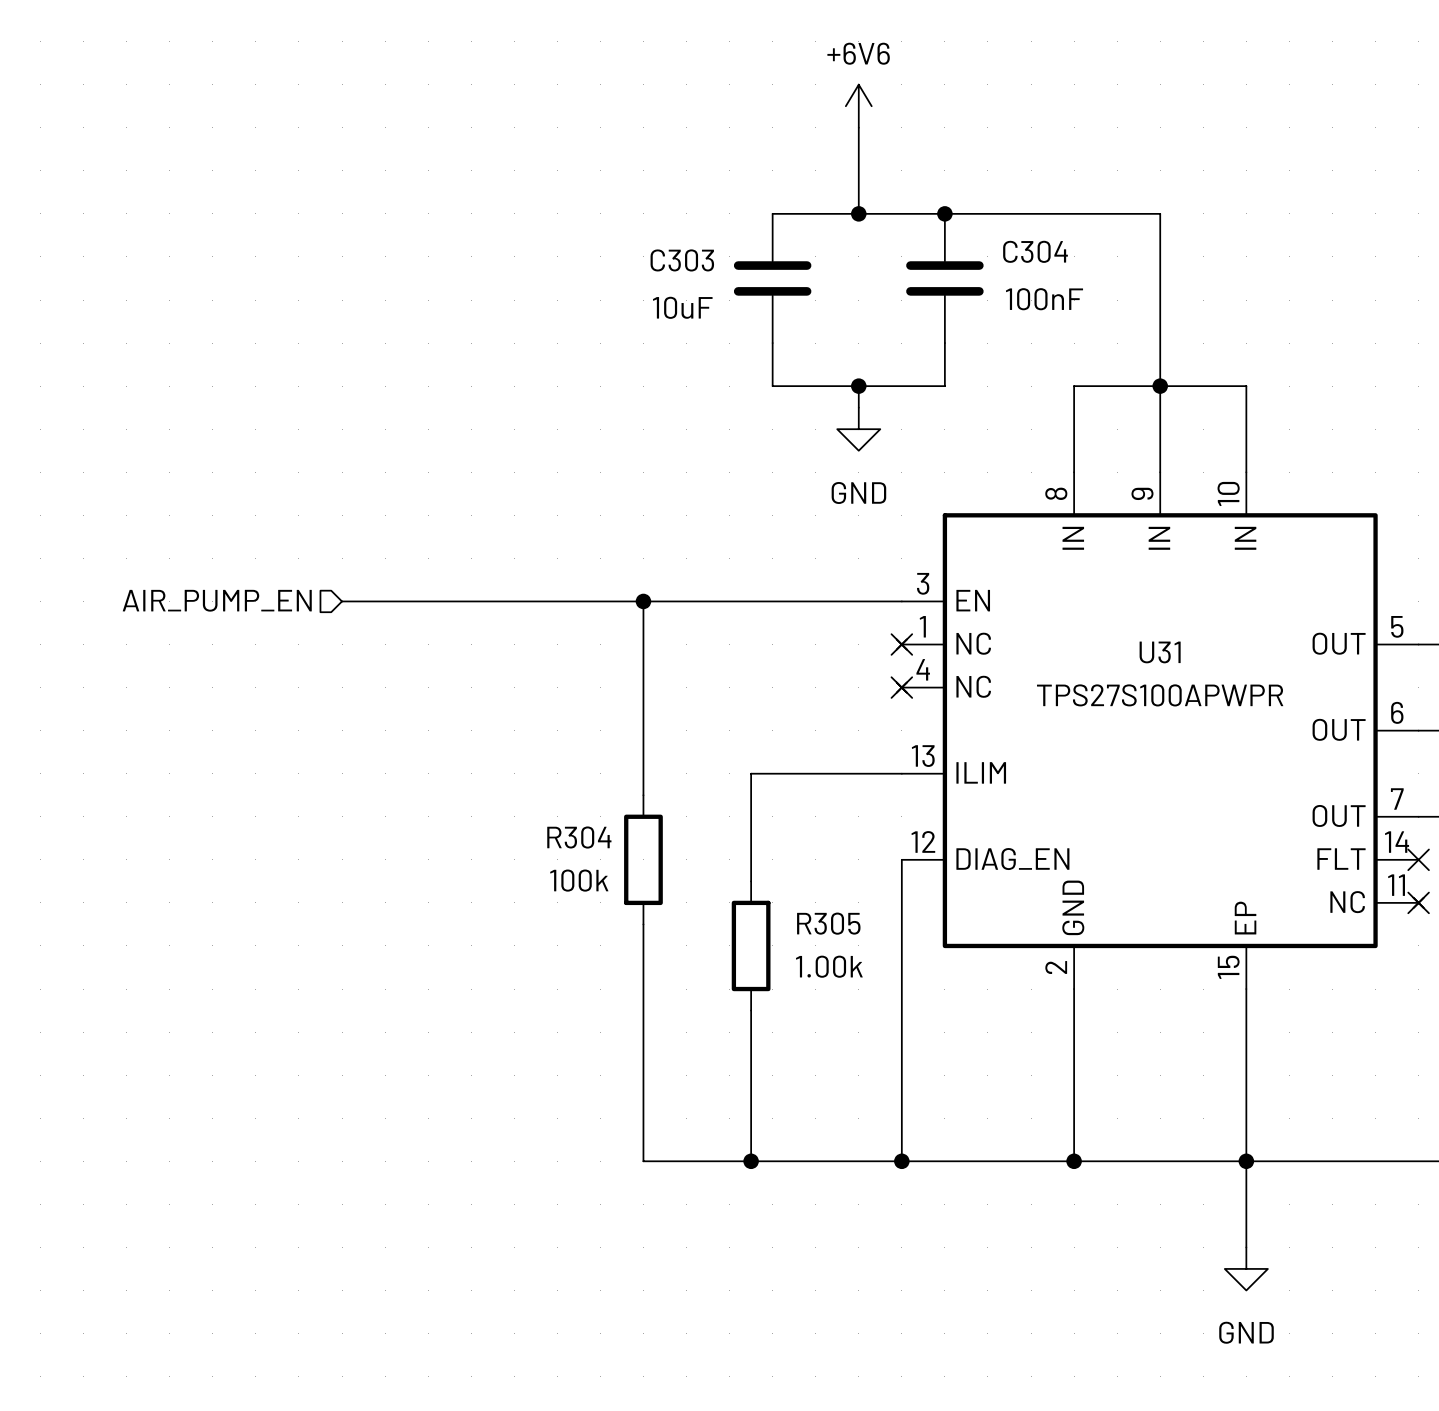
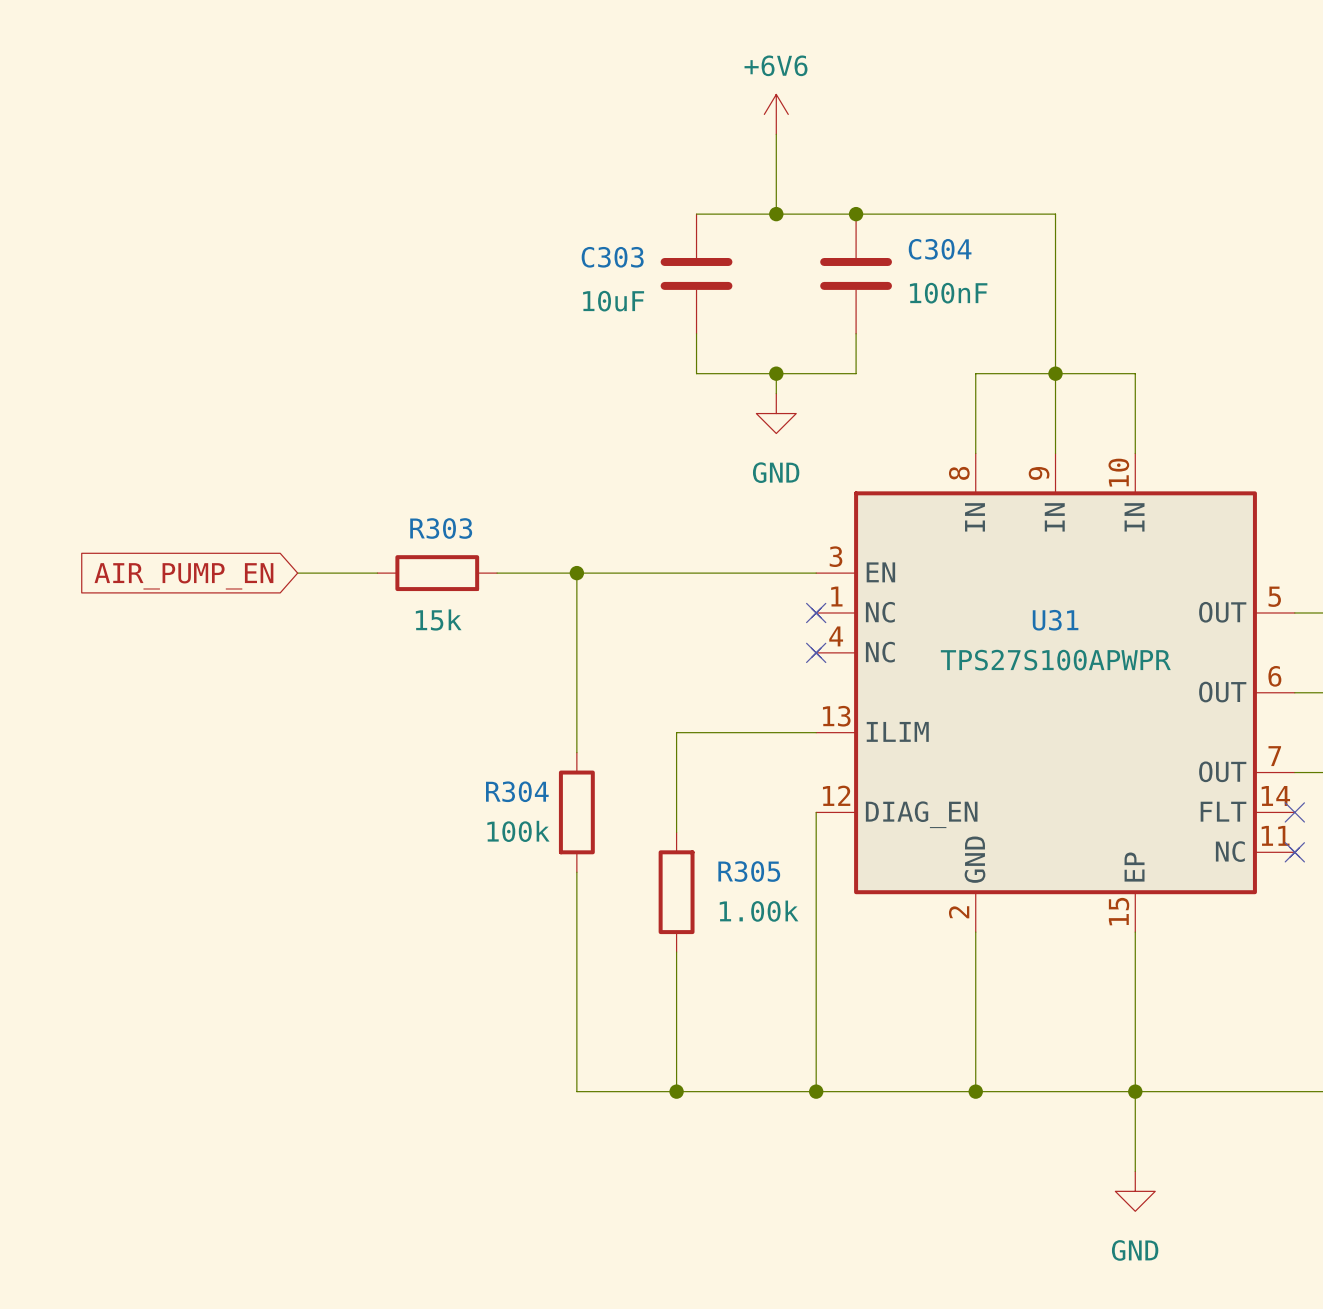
hierarchical label: AIR_PUMP_EN (217, 600) -> none
global label: none -> AIR_PUMP_EN (183, 576)
wire: (428, 601) (557, 601) -> none
R303: none -> 15k (437, 573)

